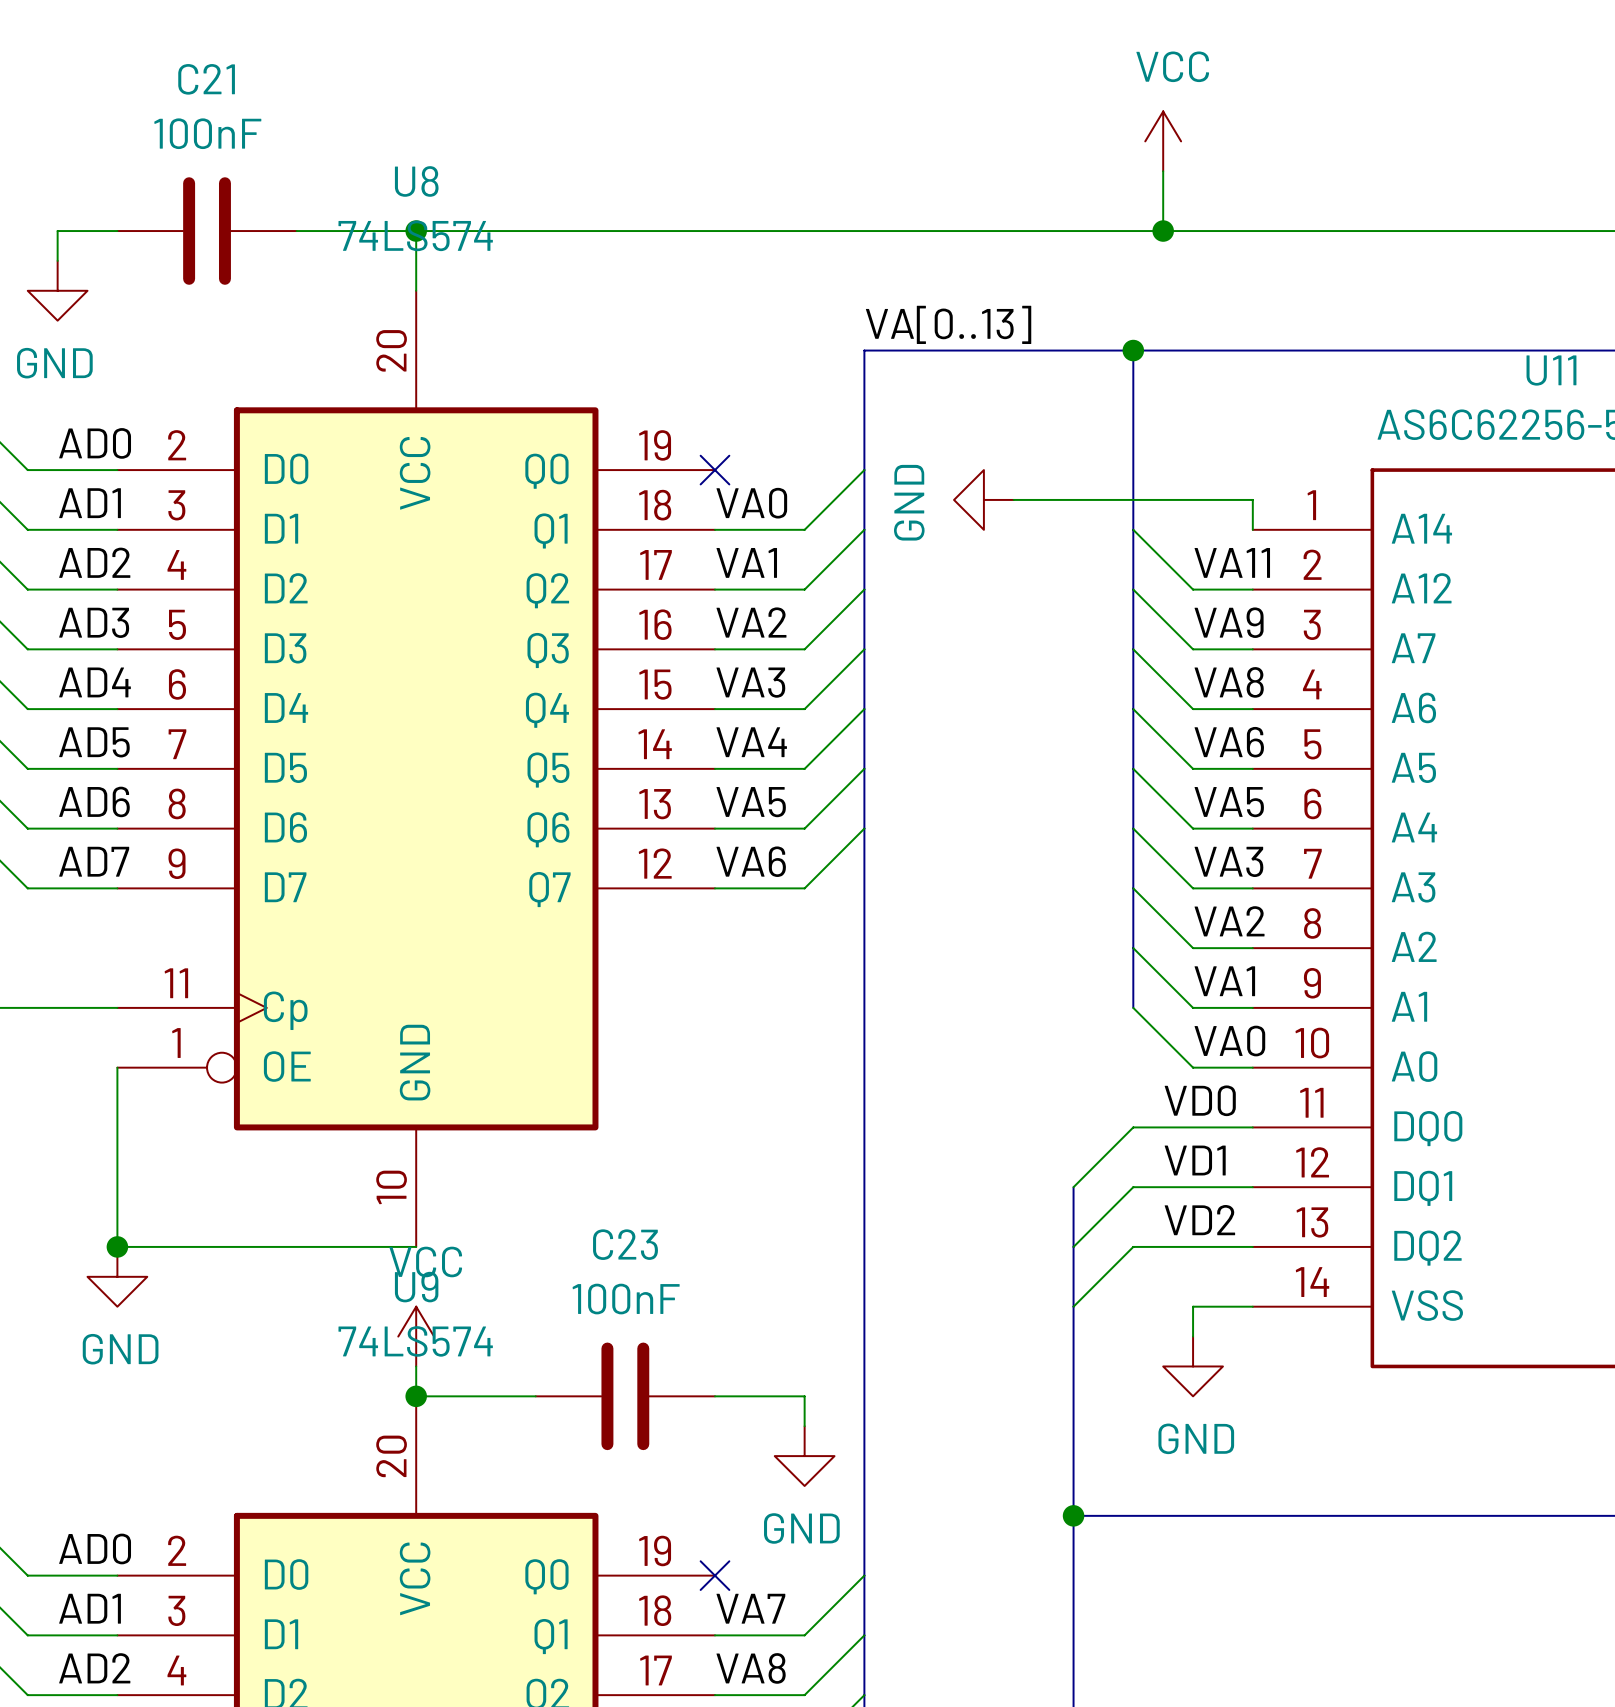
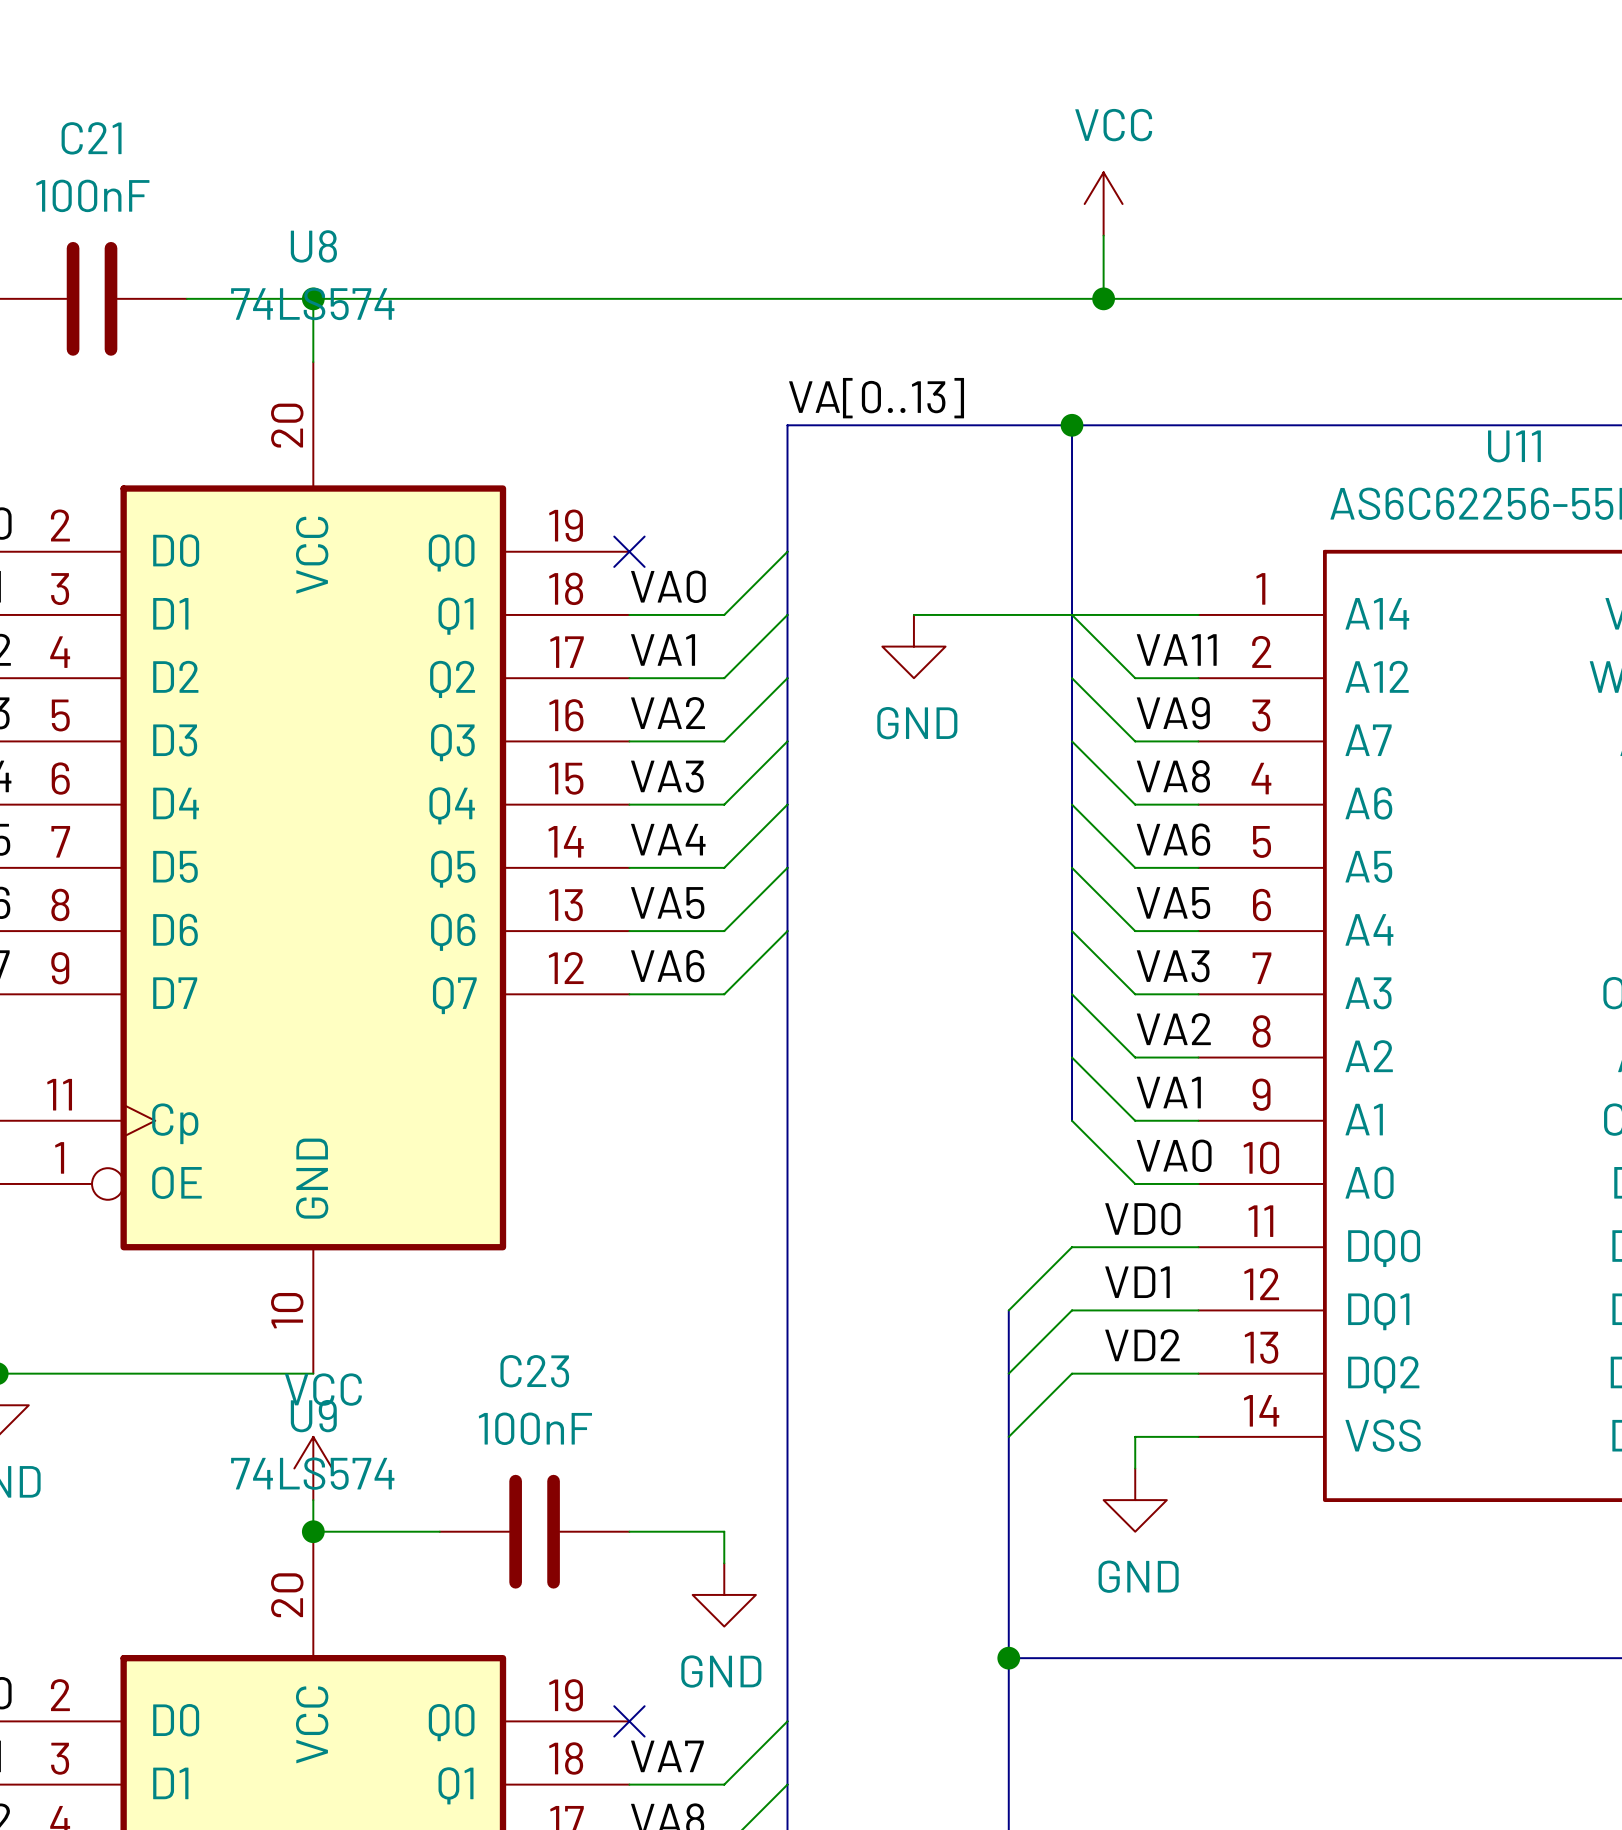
power symbol rotation: 0° (983, 499) -> 90° counterclockwise (913, 646)
power symbol position: GND (983, 499) -> GND (913, 646)
wire: (1013, 499) (1252, 499) (1252, 529) -> (913, 614) (1198, 614)

